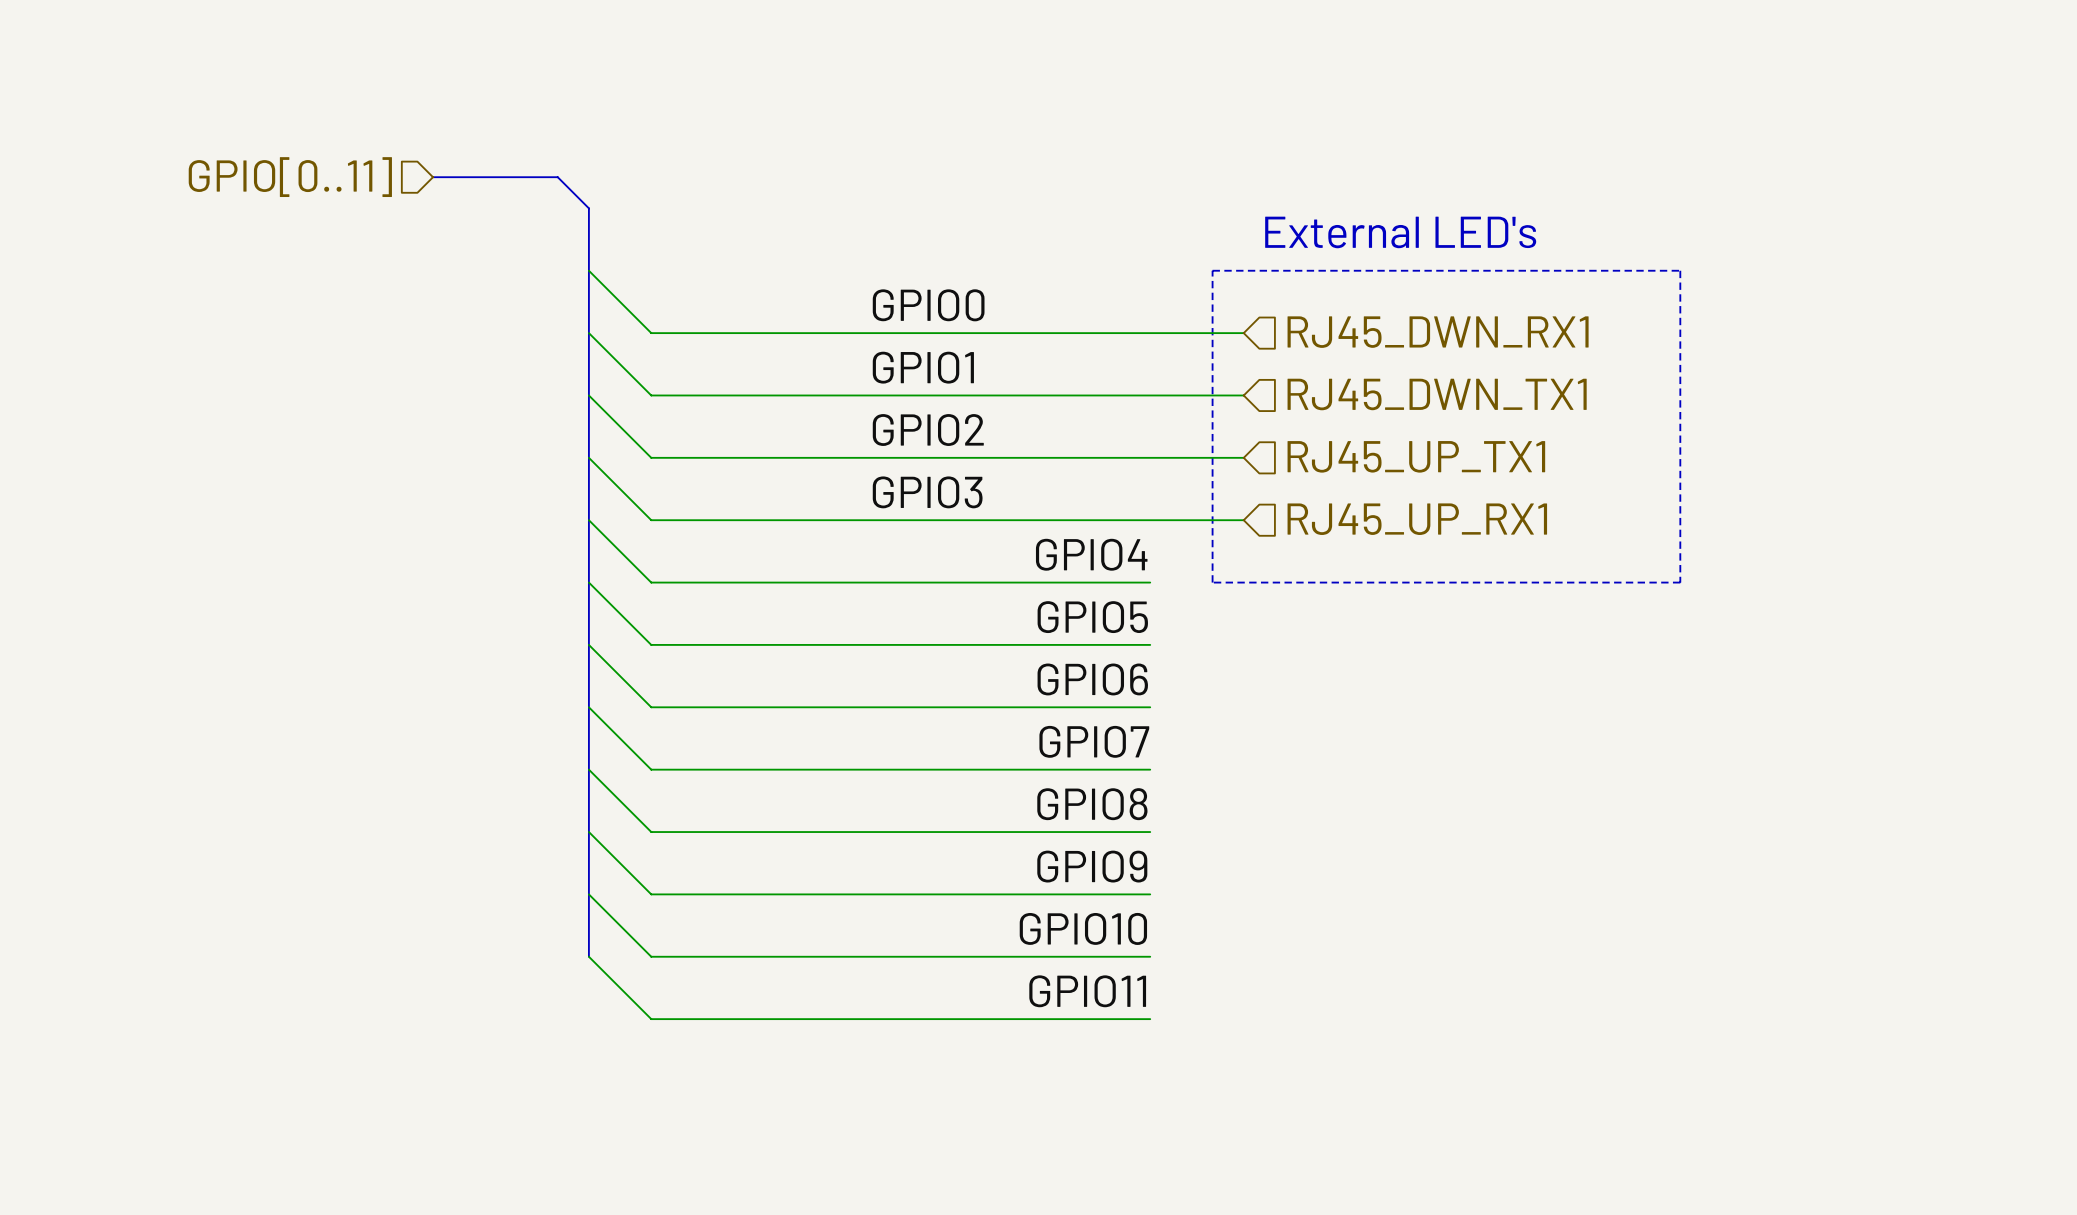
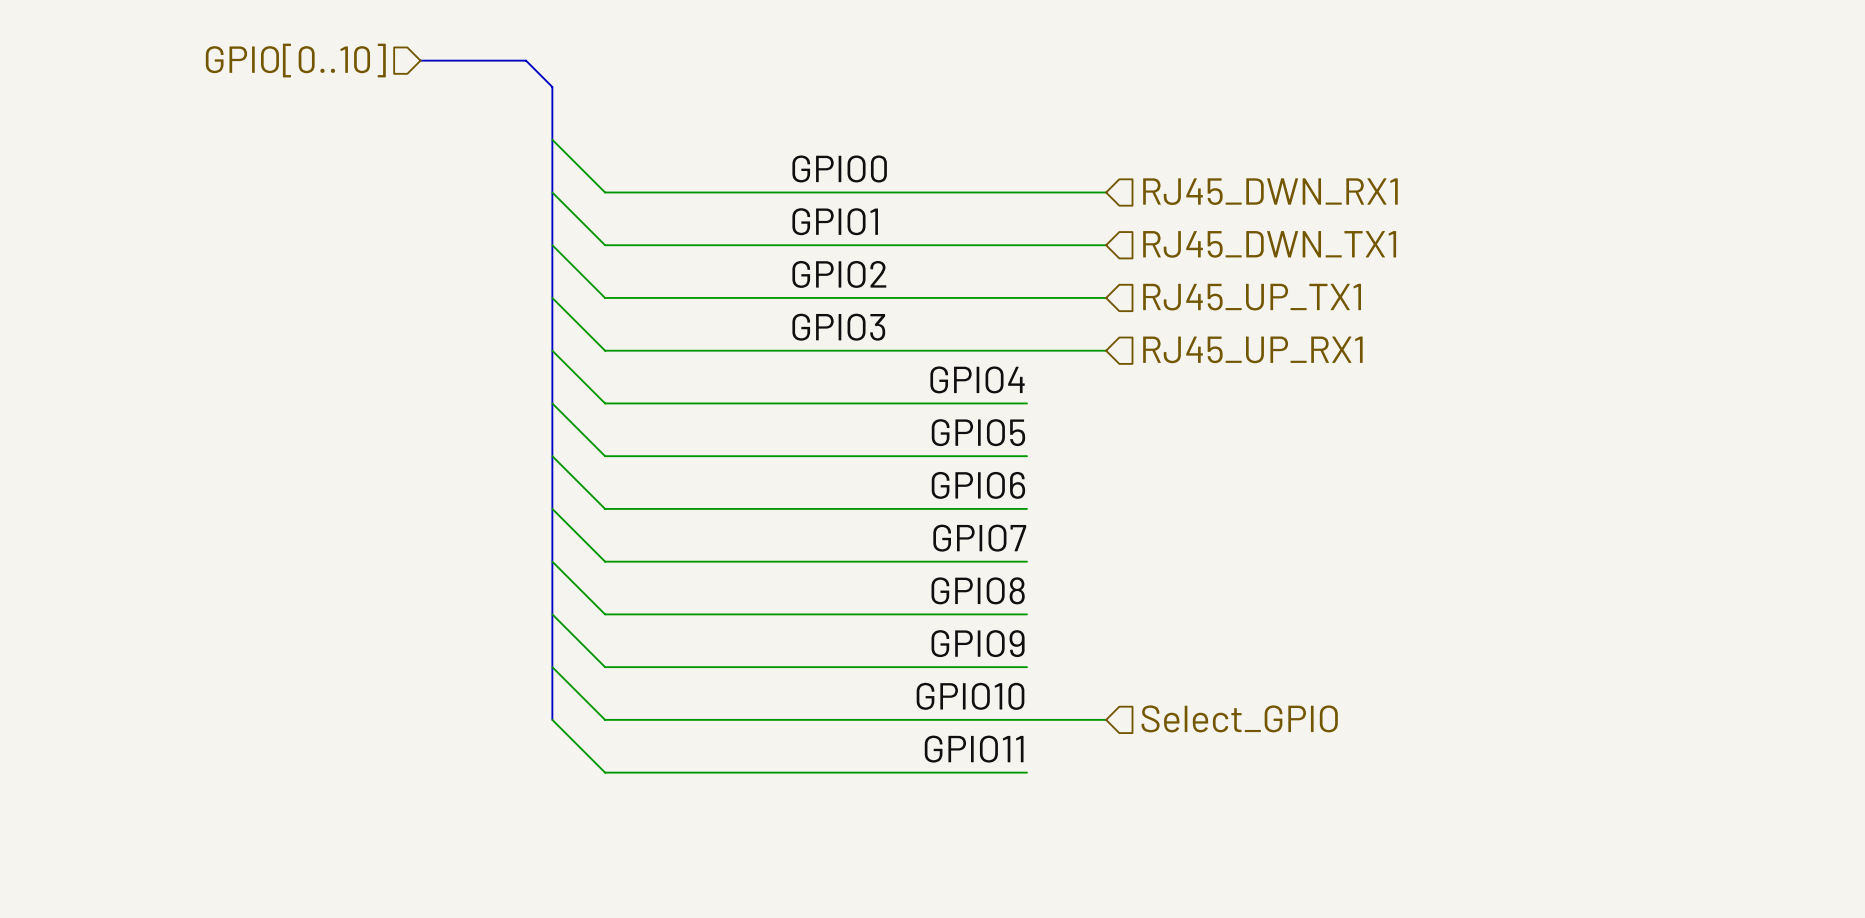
hierarchical label: GPIO[0..11] (290, 177) -> GPIO[0..10] (295, 60)
text: External LED's (1400, 232) -> none
line: (1212, 270) (1680, 270) (1680, 582) (1212, 582) (1212, 270) -> none
hierarchical label: none -> Select_GPIO (1239, 718)
wire: none -> (1027, 719) (1106, 719)

